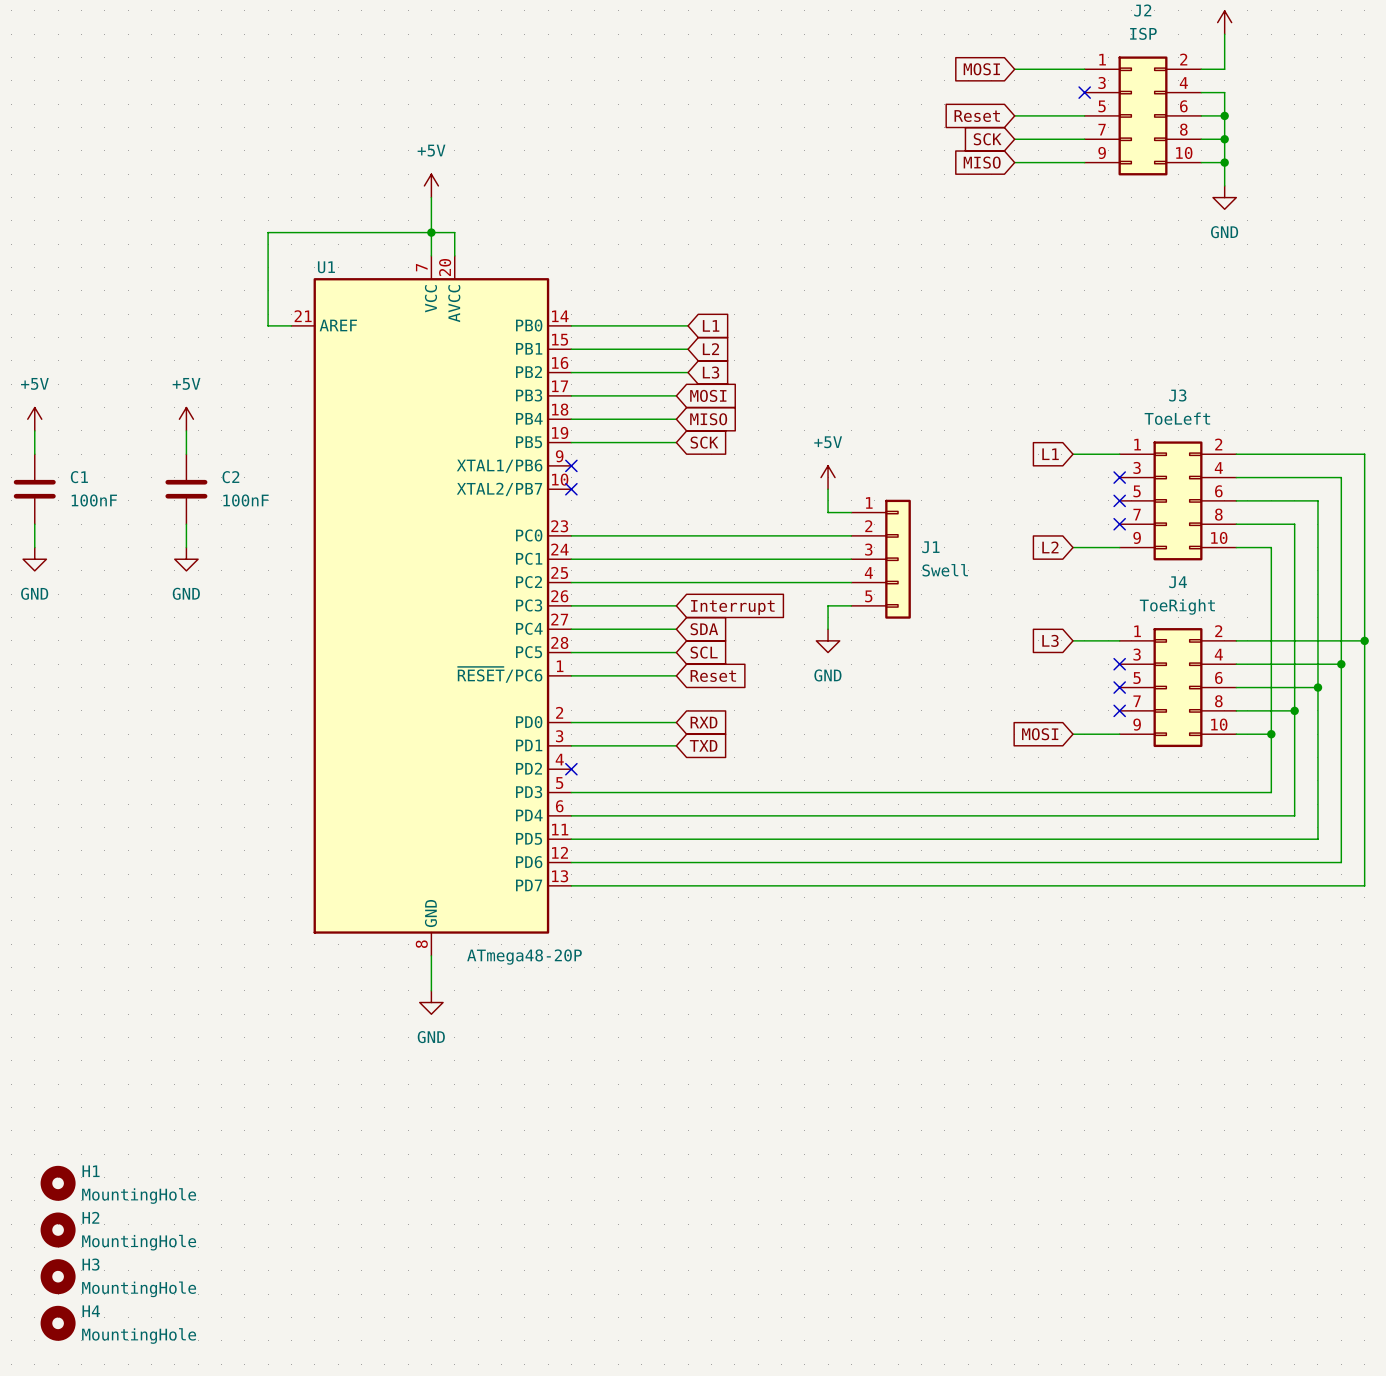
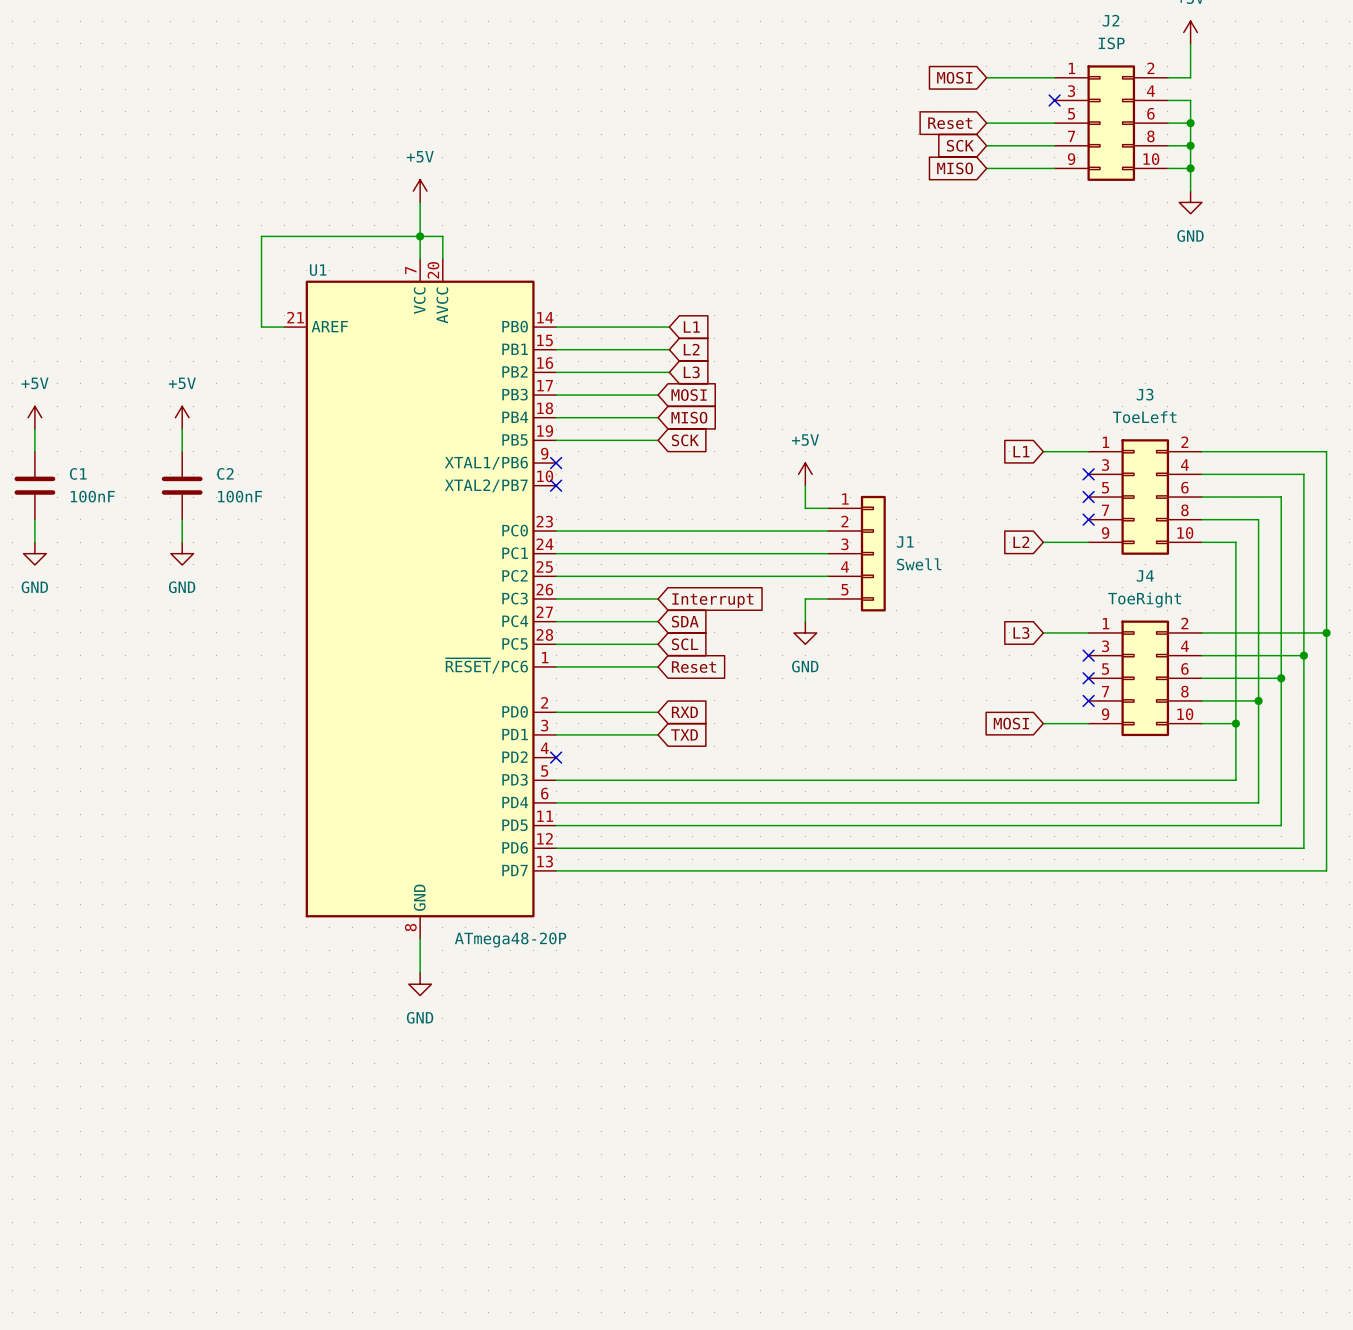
H1: MountingHole (58, 1183) -> none
H2: MountingHole (58, 1230) -> none
H3: MountingHole (58, 1276) -> none
H4: MountingHole (58, 1323) -> none

